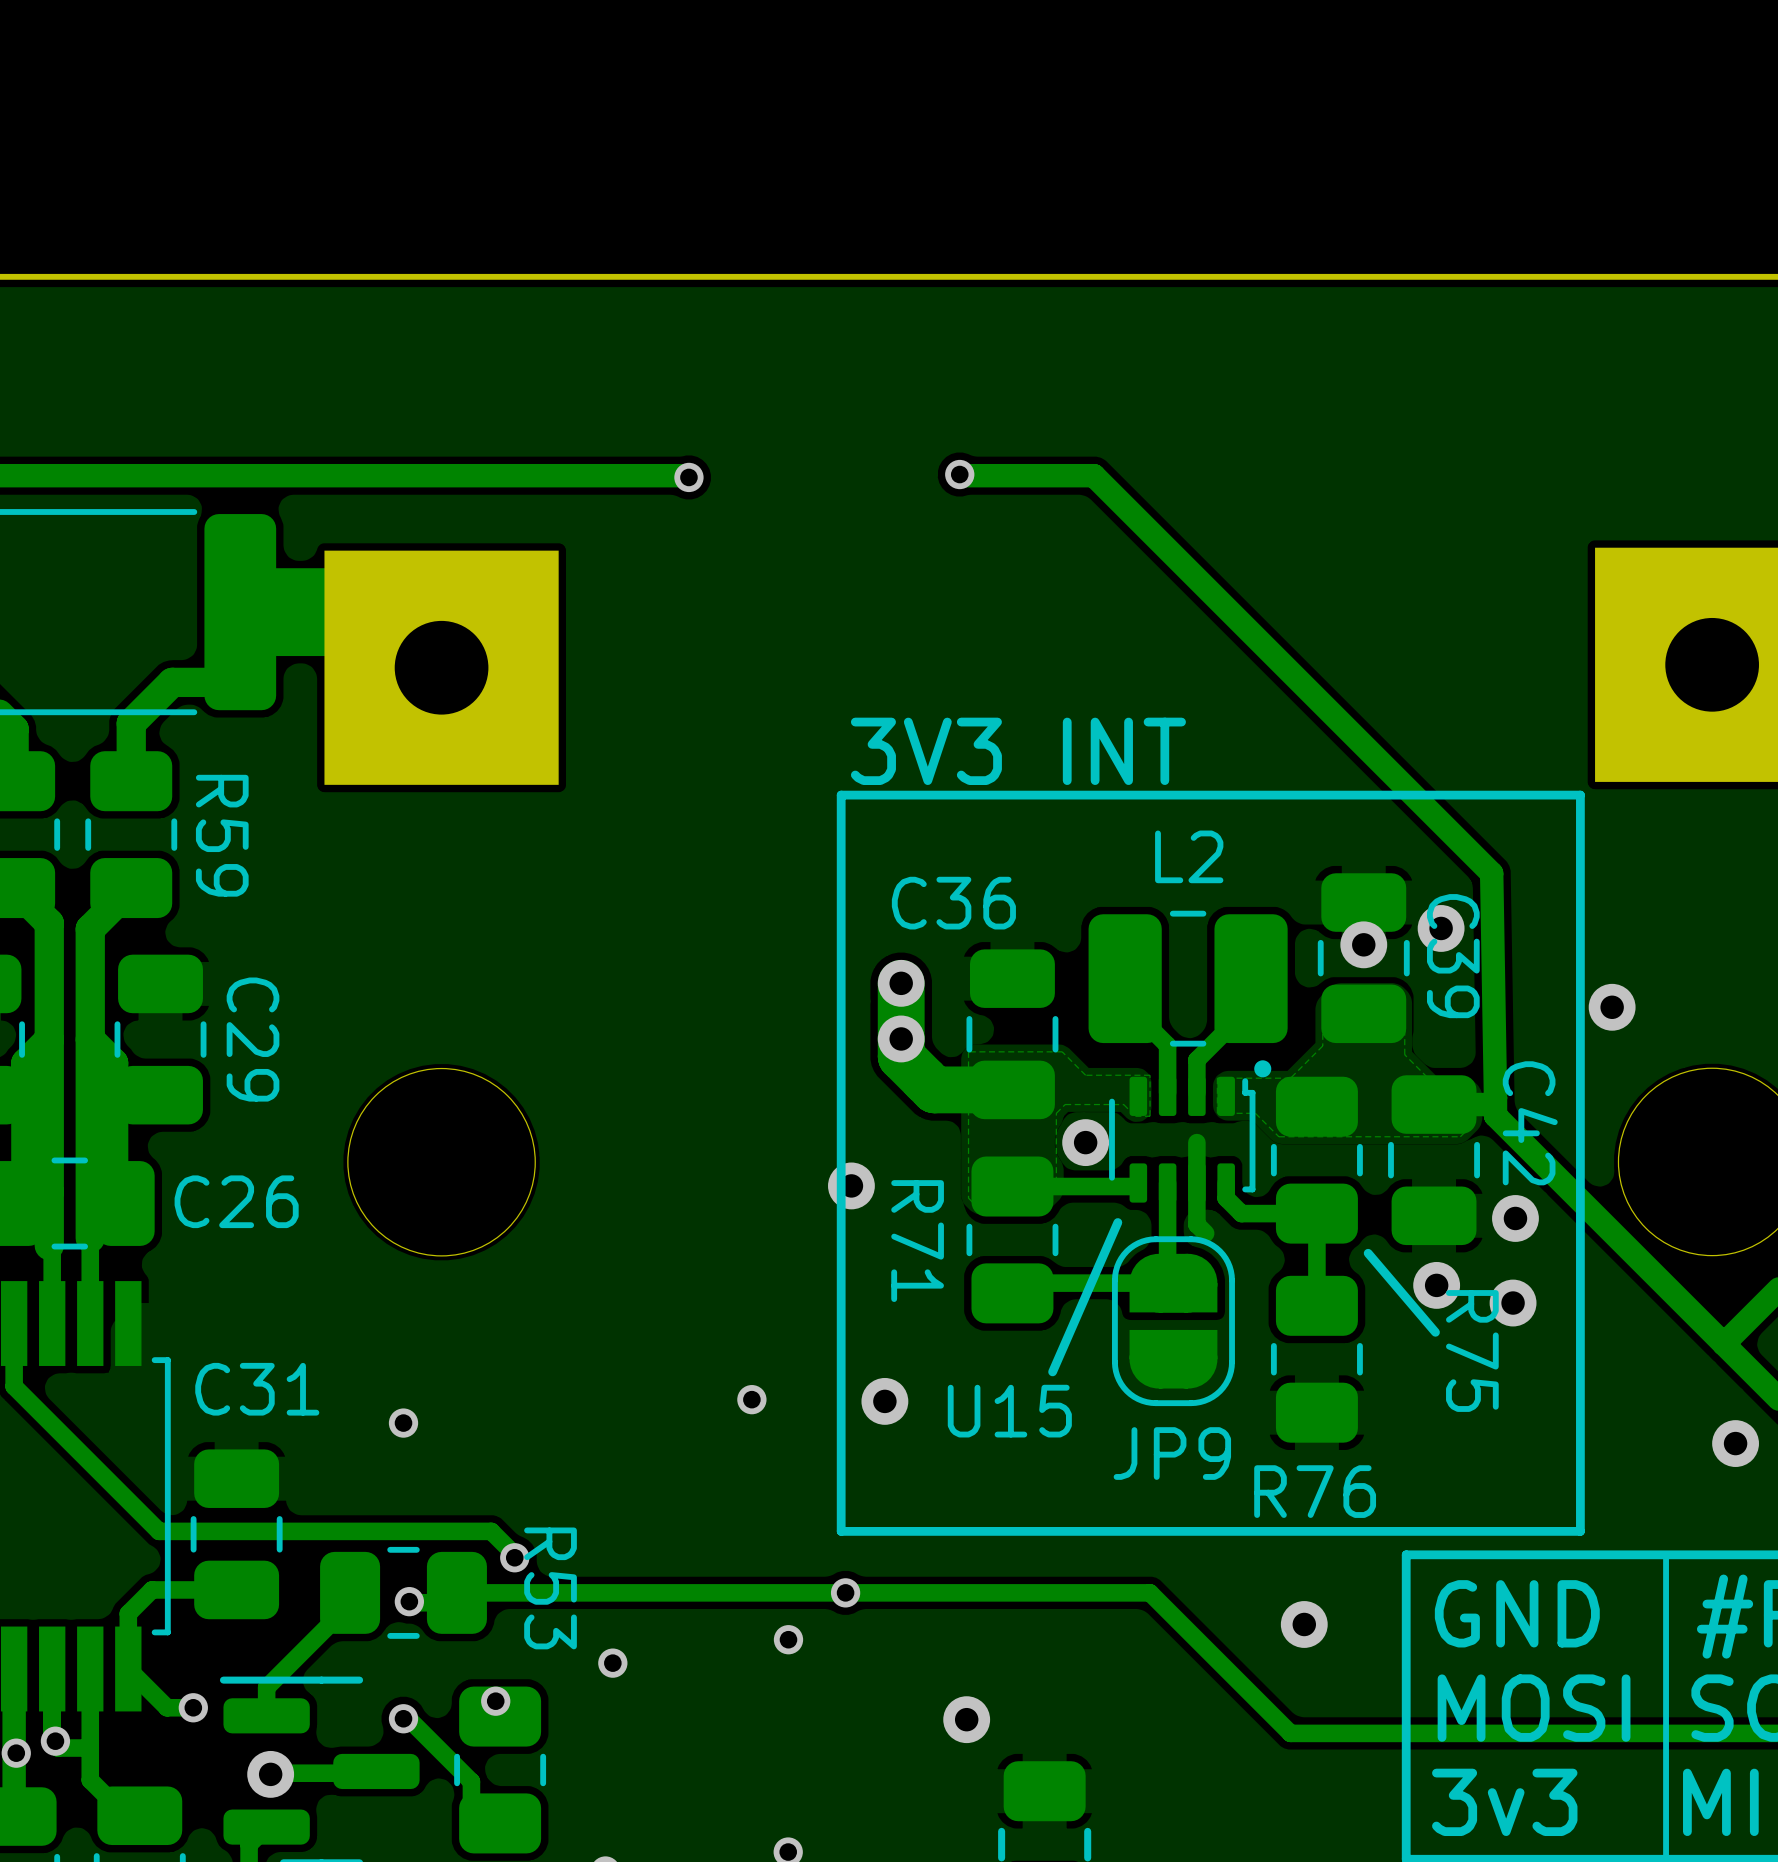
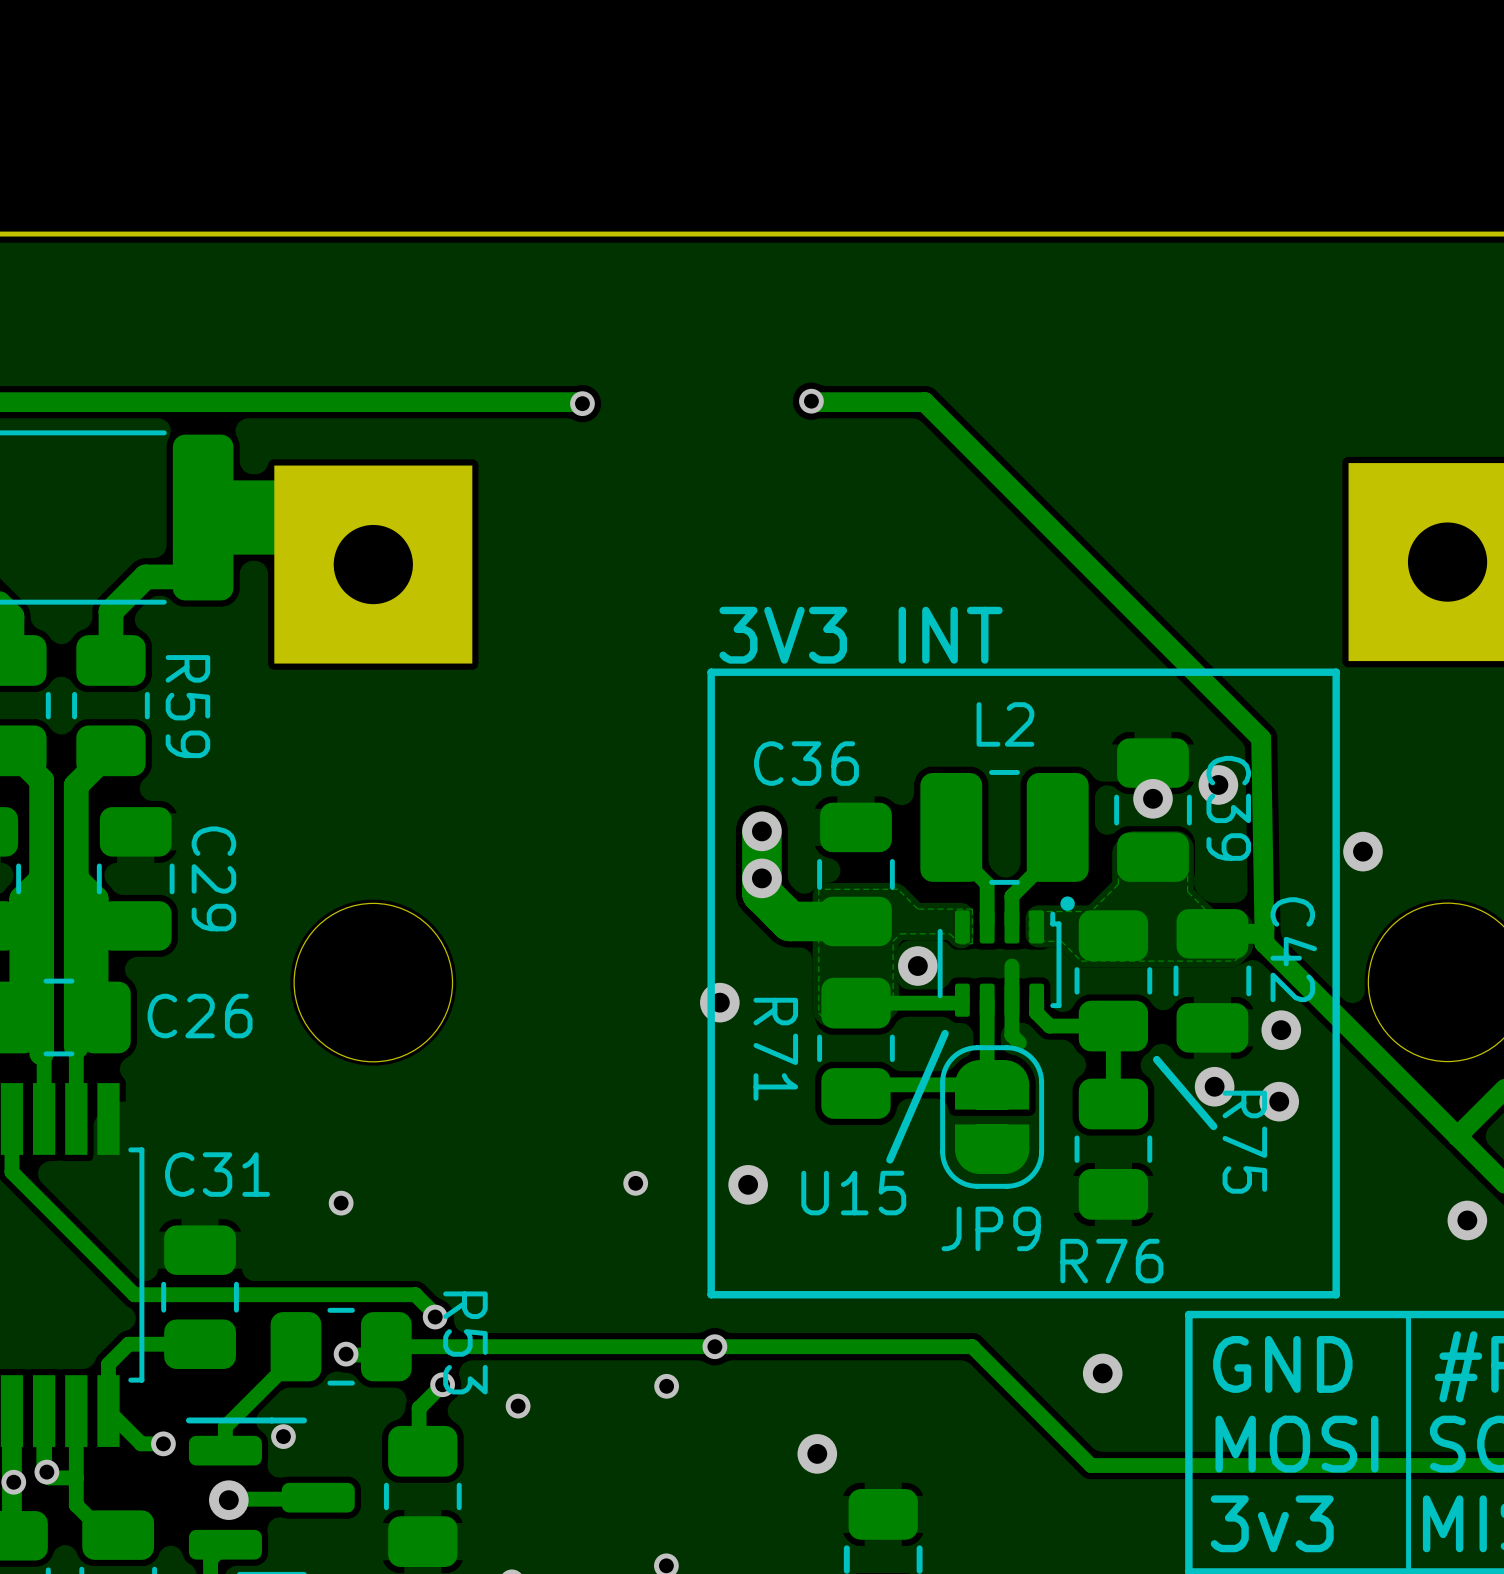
track: none -> (442, 1384) (419, 1408) (419, 1438)
via position: (495, 1701) -> (442, 1384)
track: (403, 1718) (408, 1718) (471, 1781) (471, 1828) -> none
via position: (403, 1718) -> (283, 1436)

